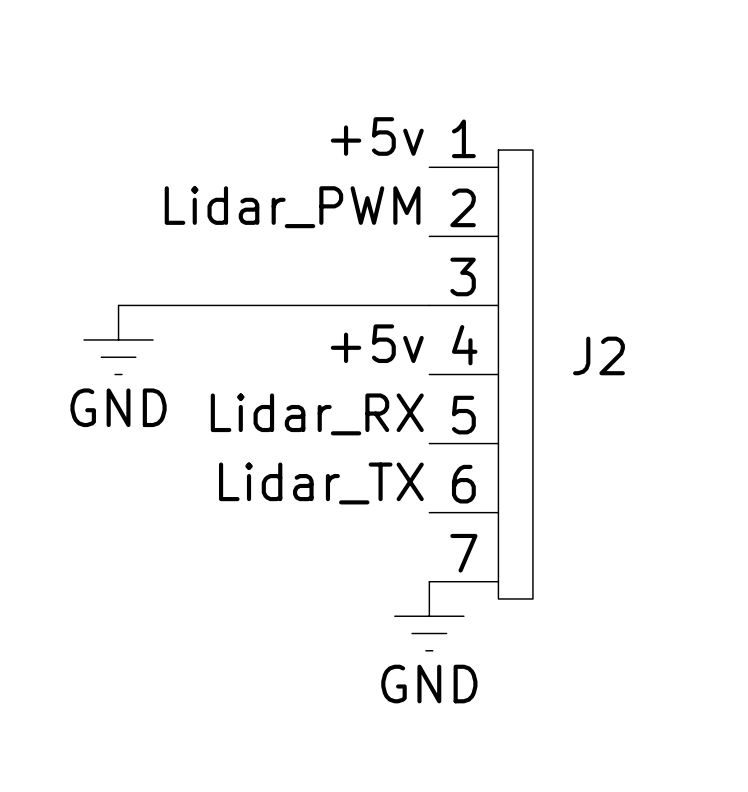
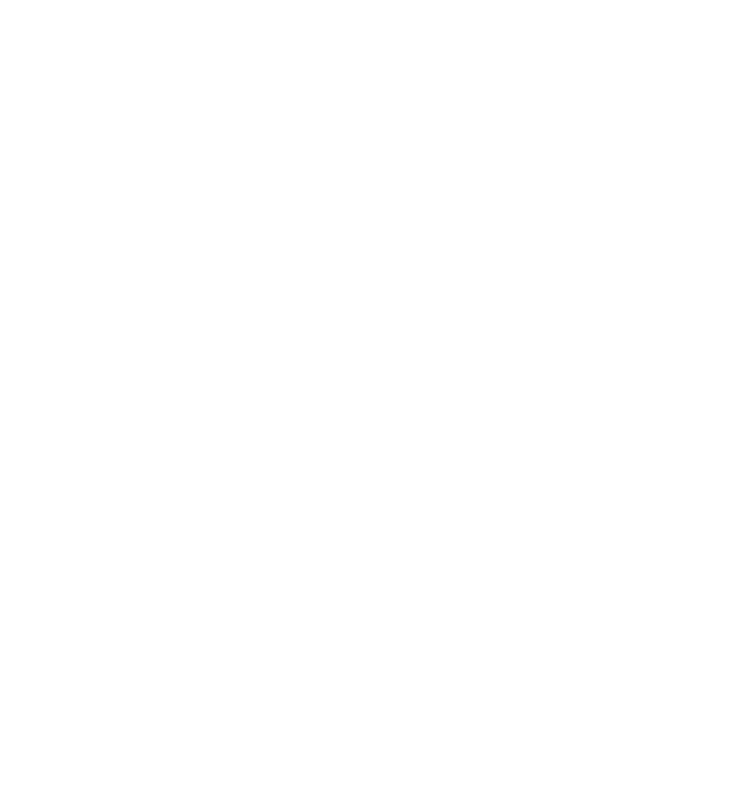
label: +5v (377, 136) -> none
label: Lidar_PWM (292, 207) -> none
wire: (118, 305) (429, 305) -> none
power symbol: GND (118, 339) -> none
label: +5v (377, 343) -> none
J2: (481, 374) -> none
label: Lidar_RX (317, 414) -> none
label: Lidar_TX (321, 483) -> none
power symbol: GND (429, 616) -> none

